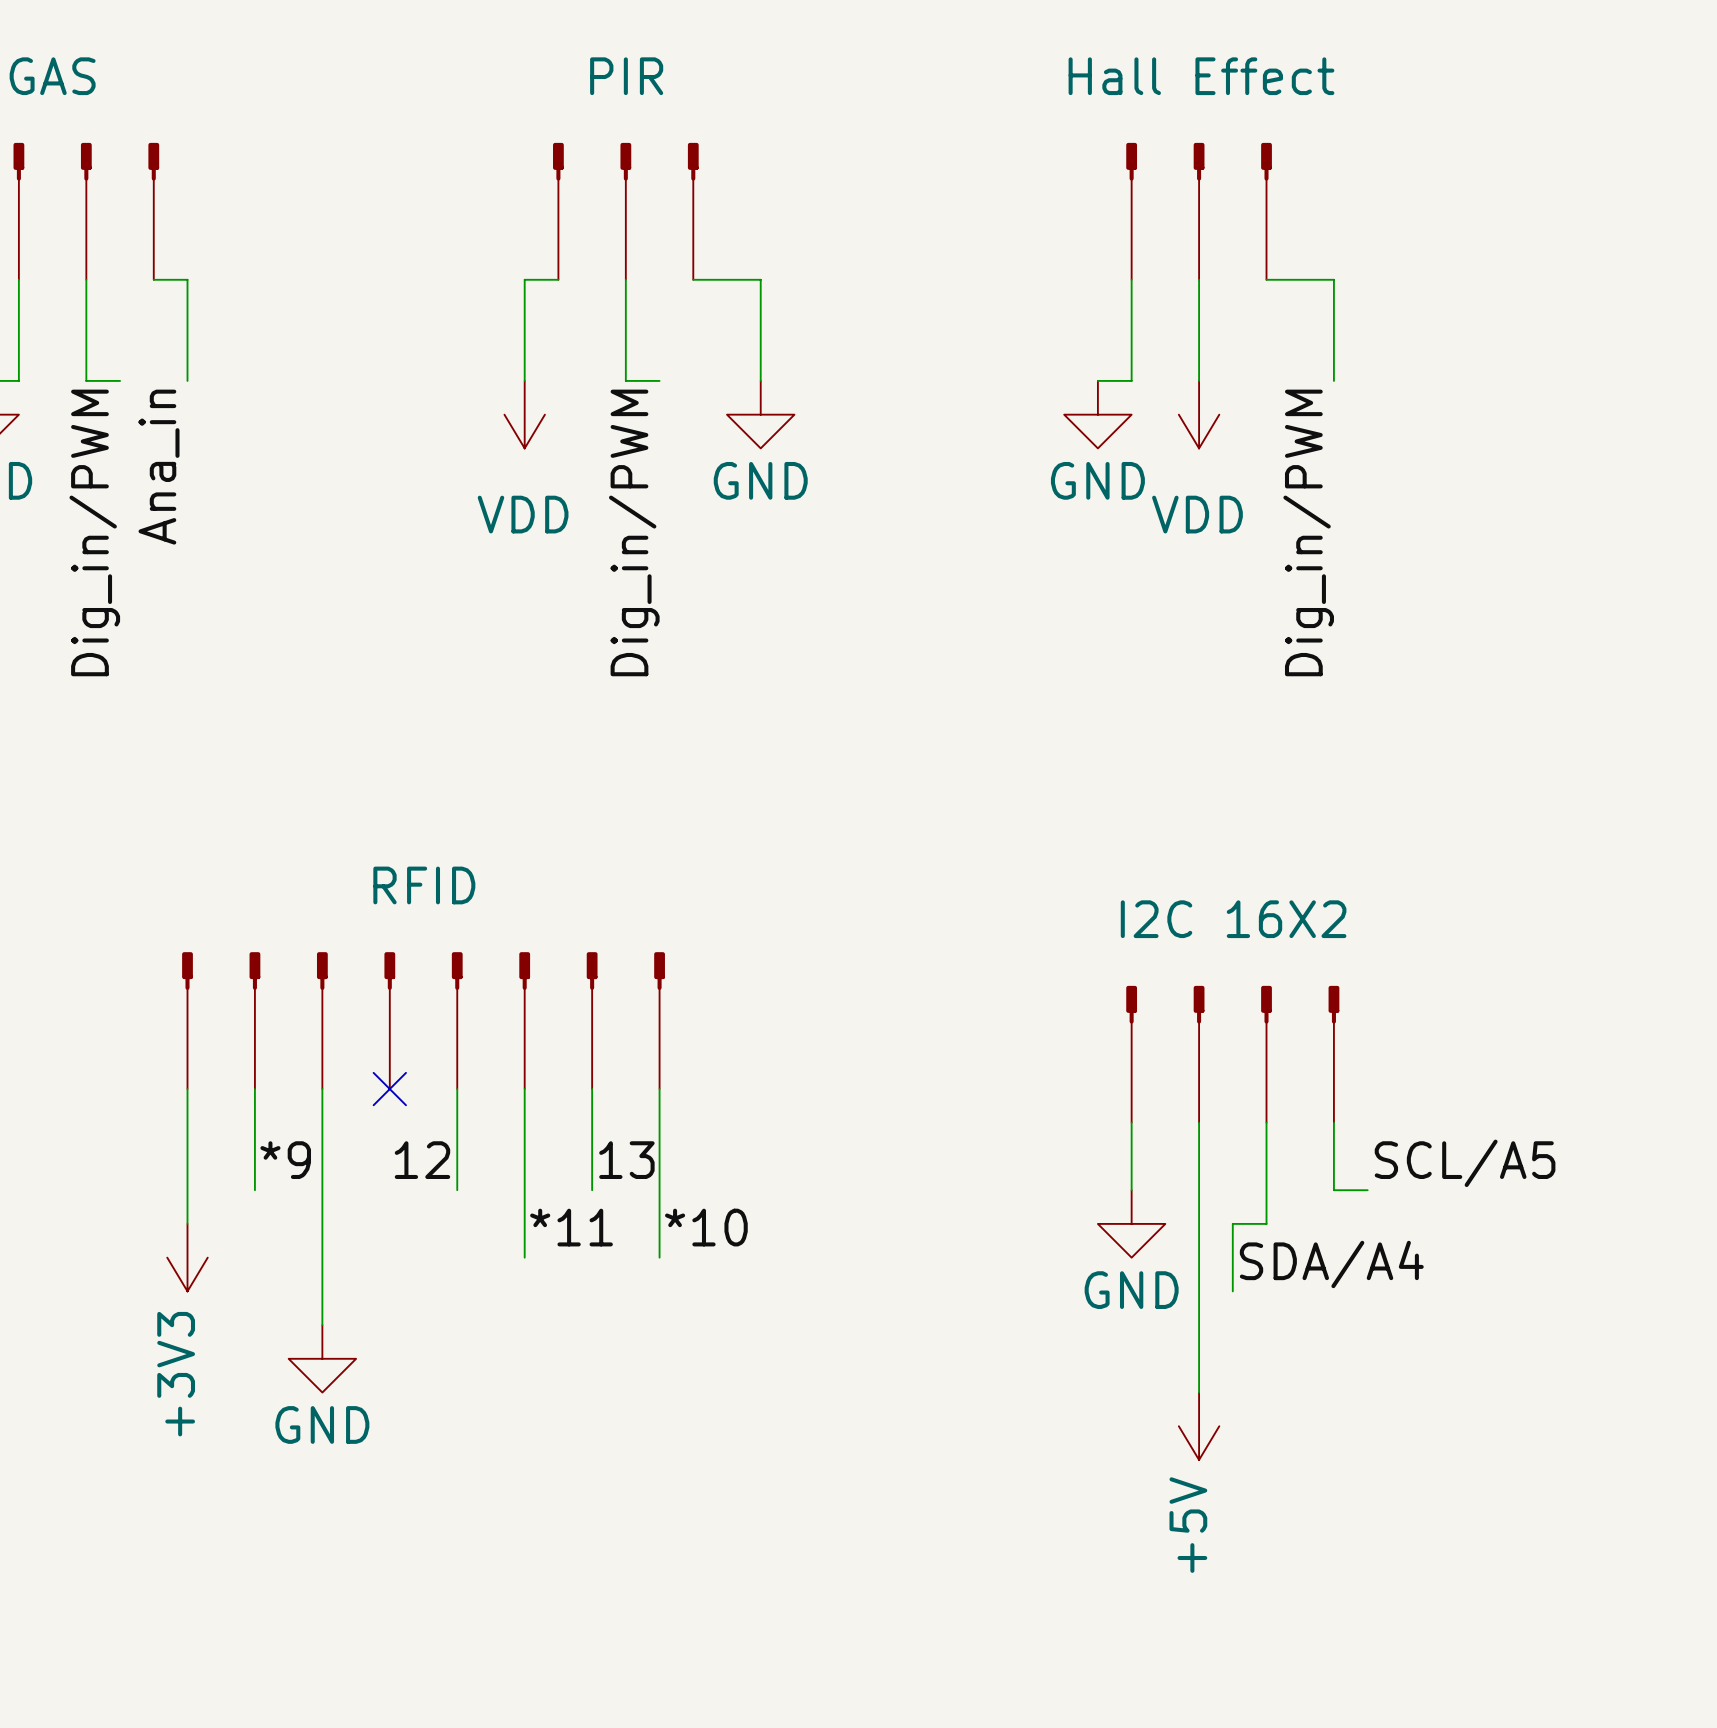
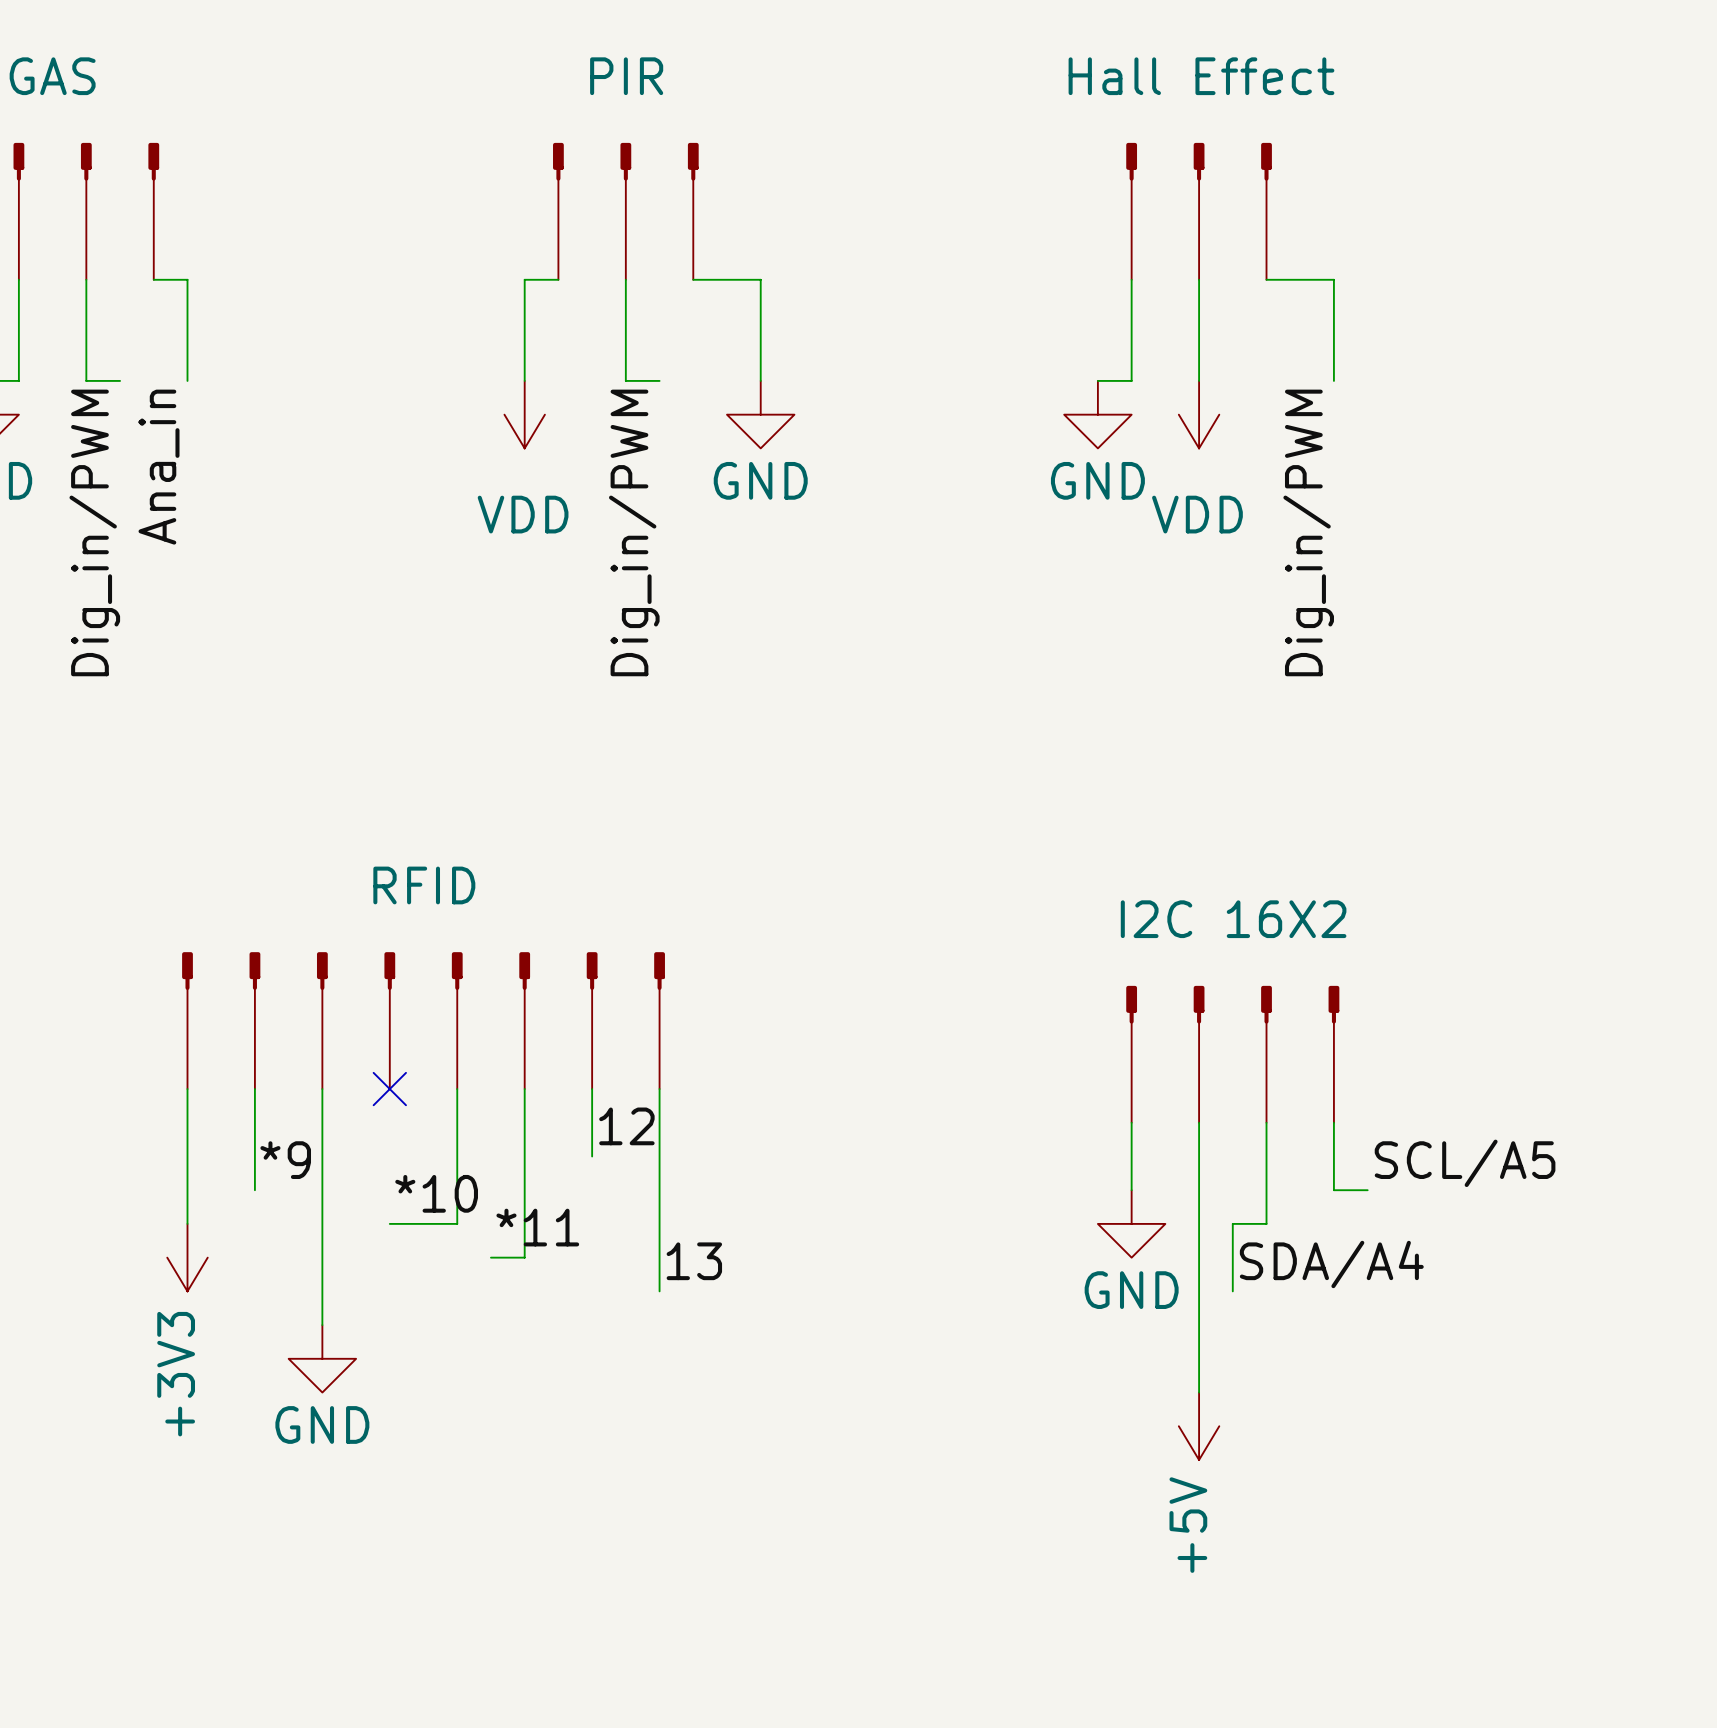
wire: (592, 1156) (592, 1190) -> (659, 1257) (659, 1291)
label position: 12 (422, 1160) -> 12 (626, 1126)
label position: 13 (626, 1160) -> 13 (694, 1261)
wire: none -> (457, 1190) (457, 1223) (389, 1223)
label position: *11 (571, 1227) -> *11 (537, 1227)
label position: *10 (706, 1227) -> *10 (436, 1193)
wire: none -> (490, 1257) (524, 1257)

